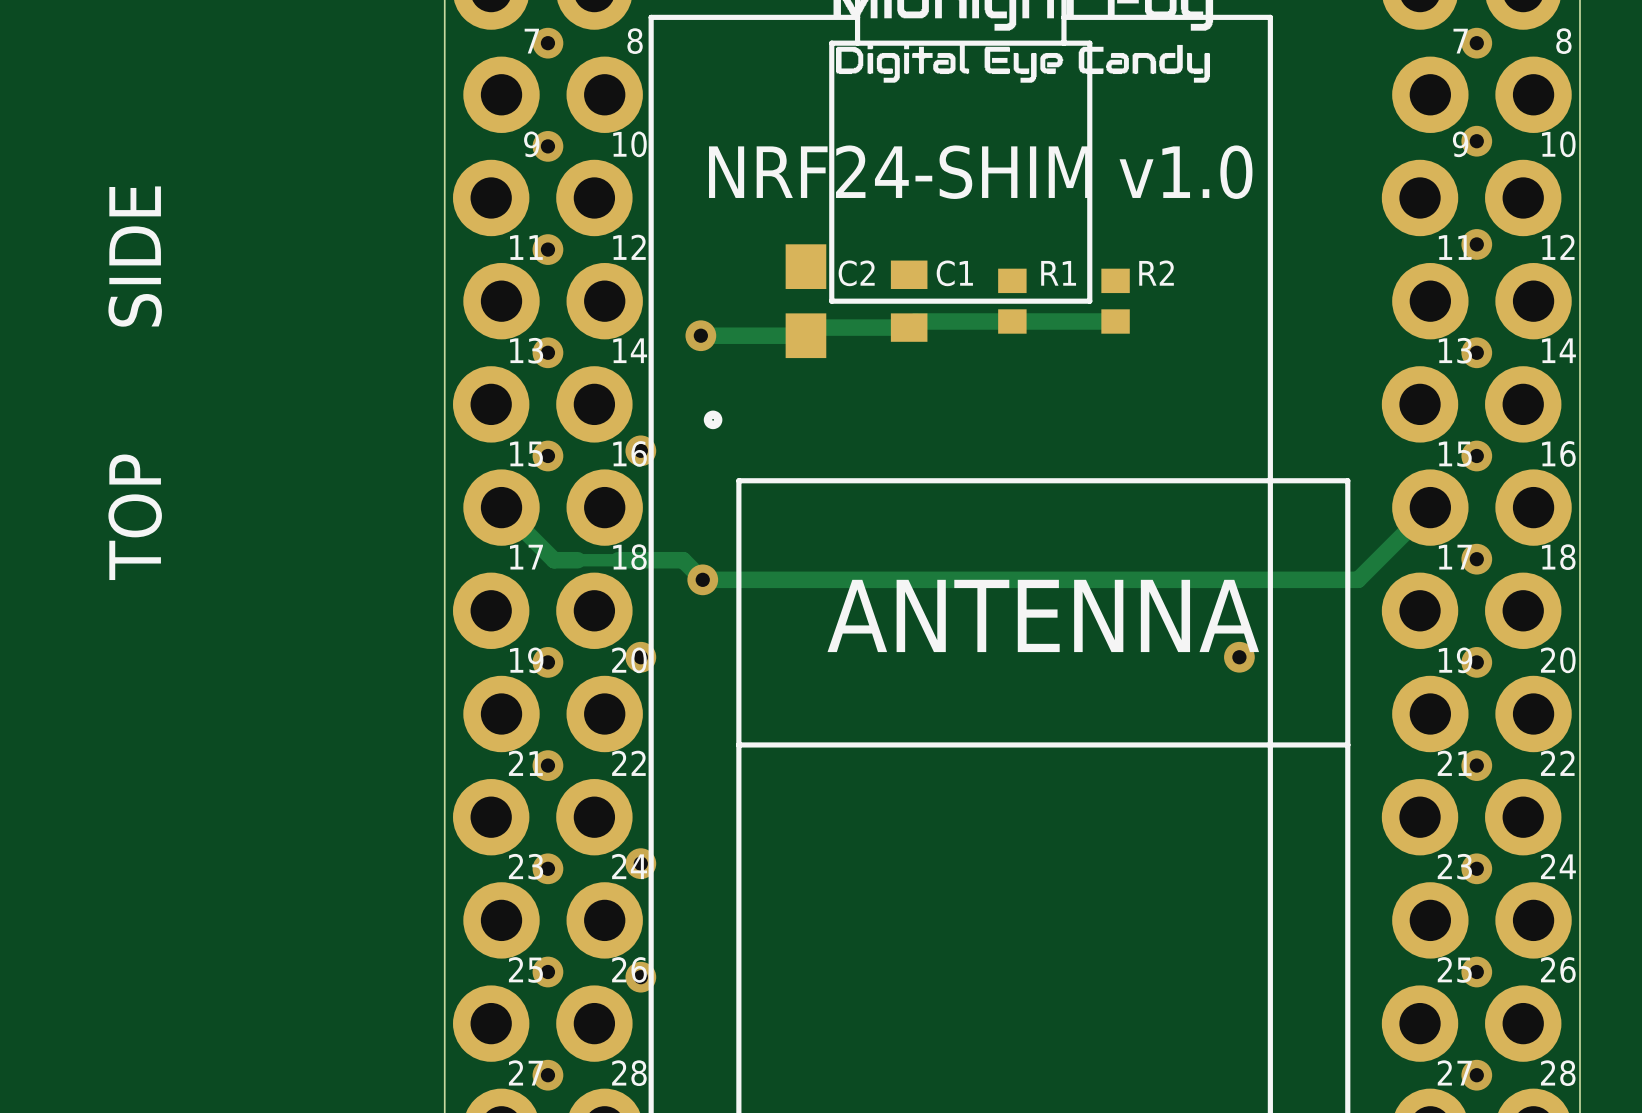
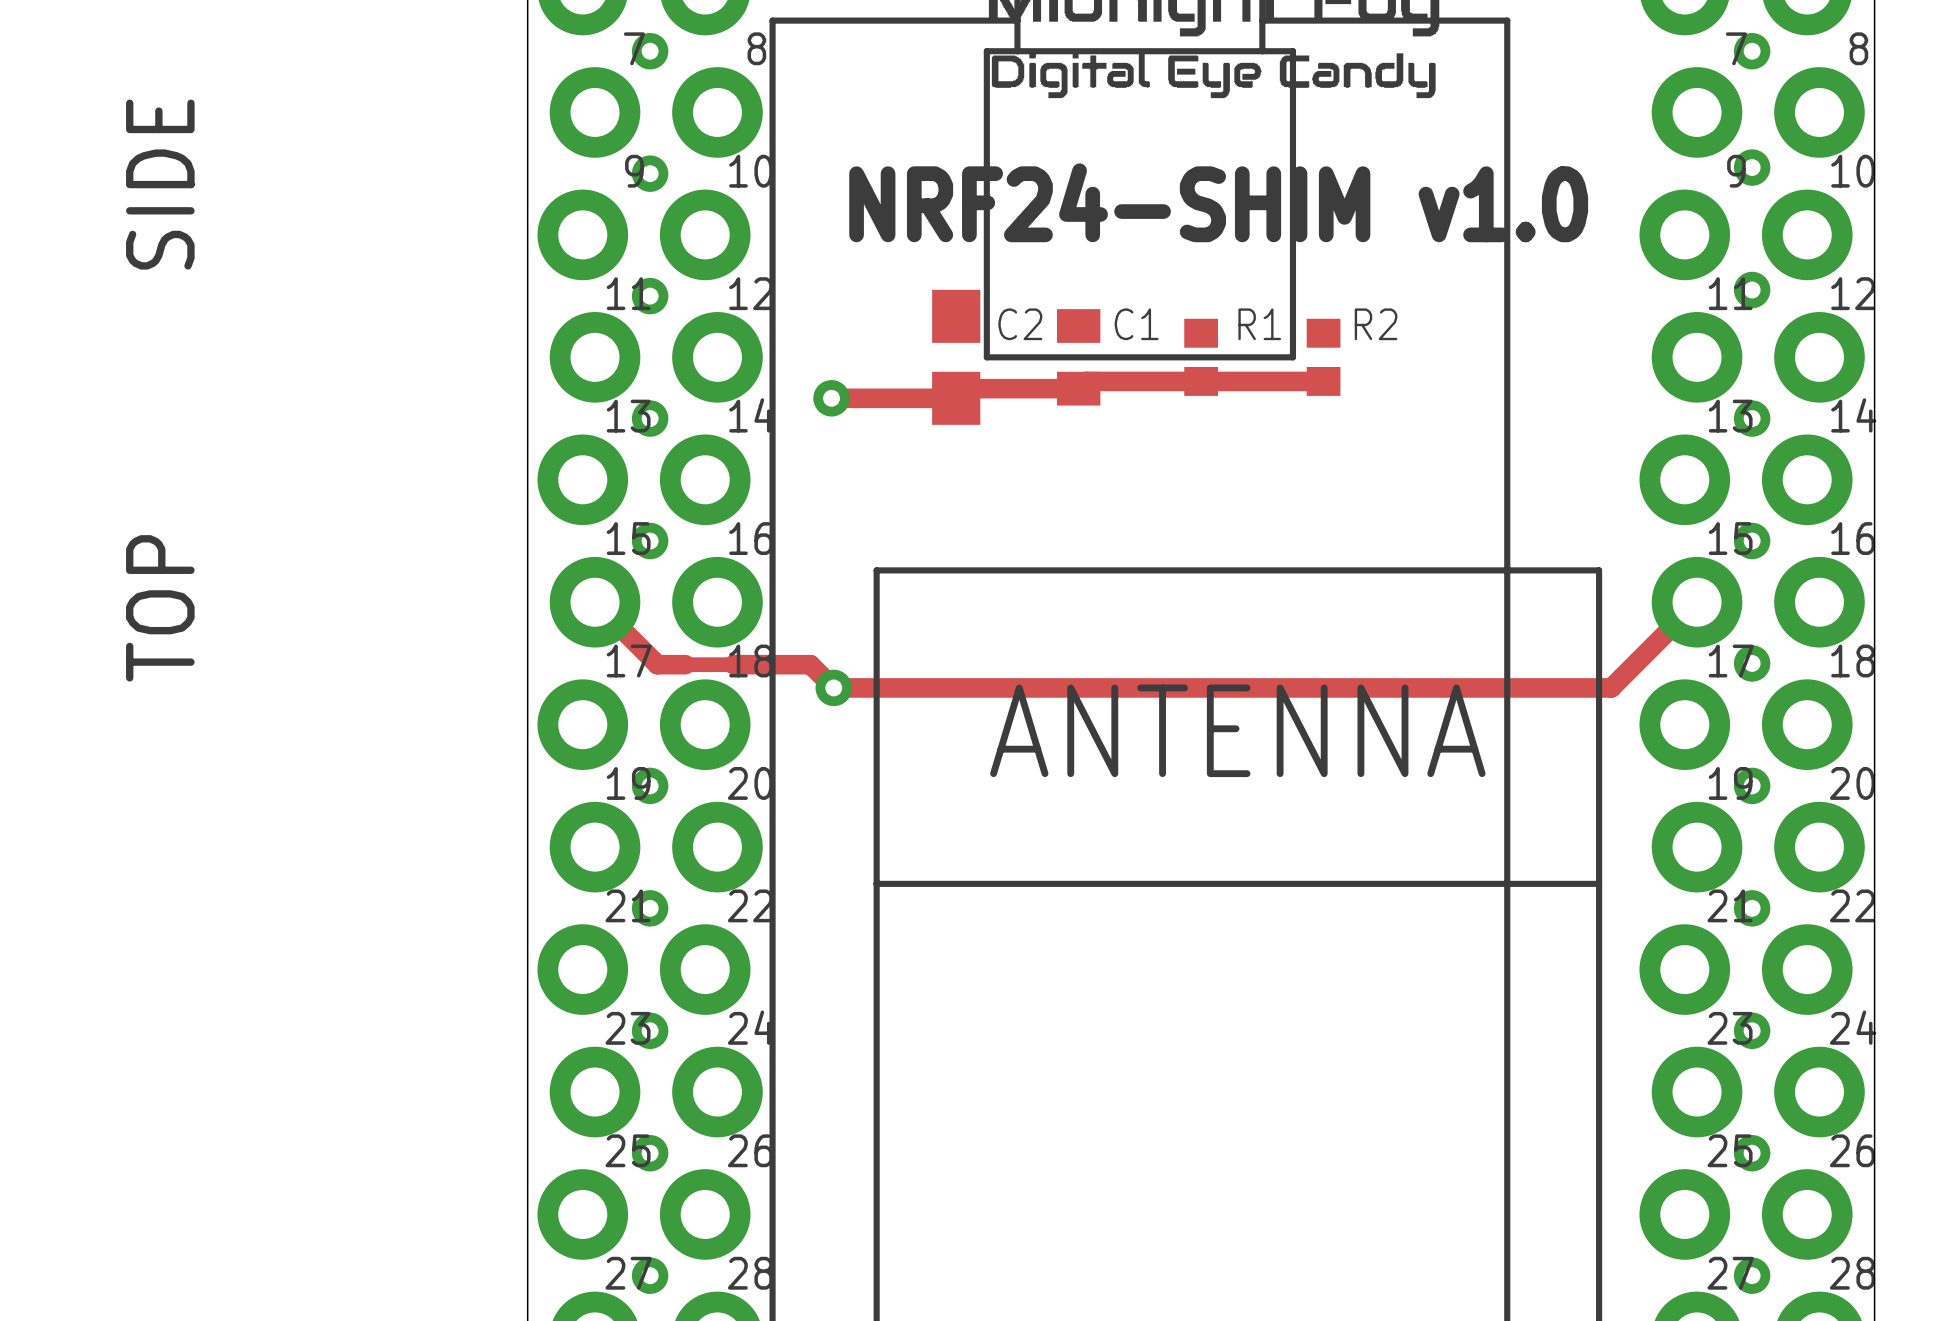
drawing: [703, 410, 723, 430] -> none
via: (640, 450) -> none
via: (640, 657) -> none
via: (1239, 657) -> none
via: (640, 863) -> none
via: (640, 977) -> none

